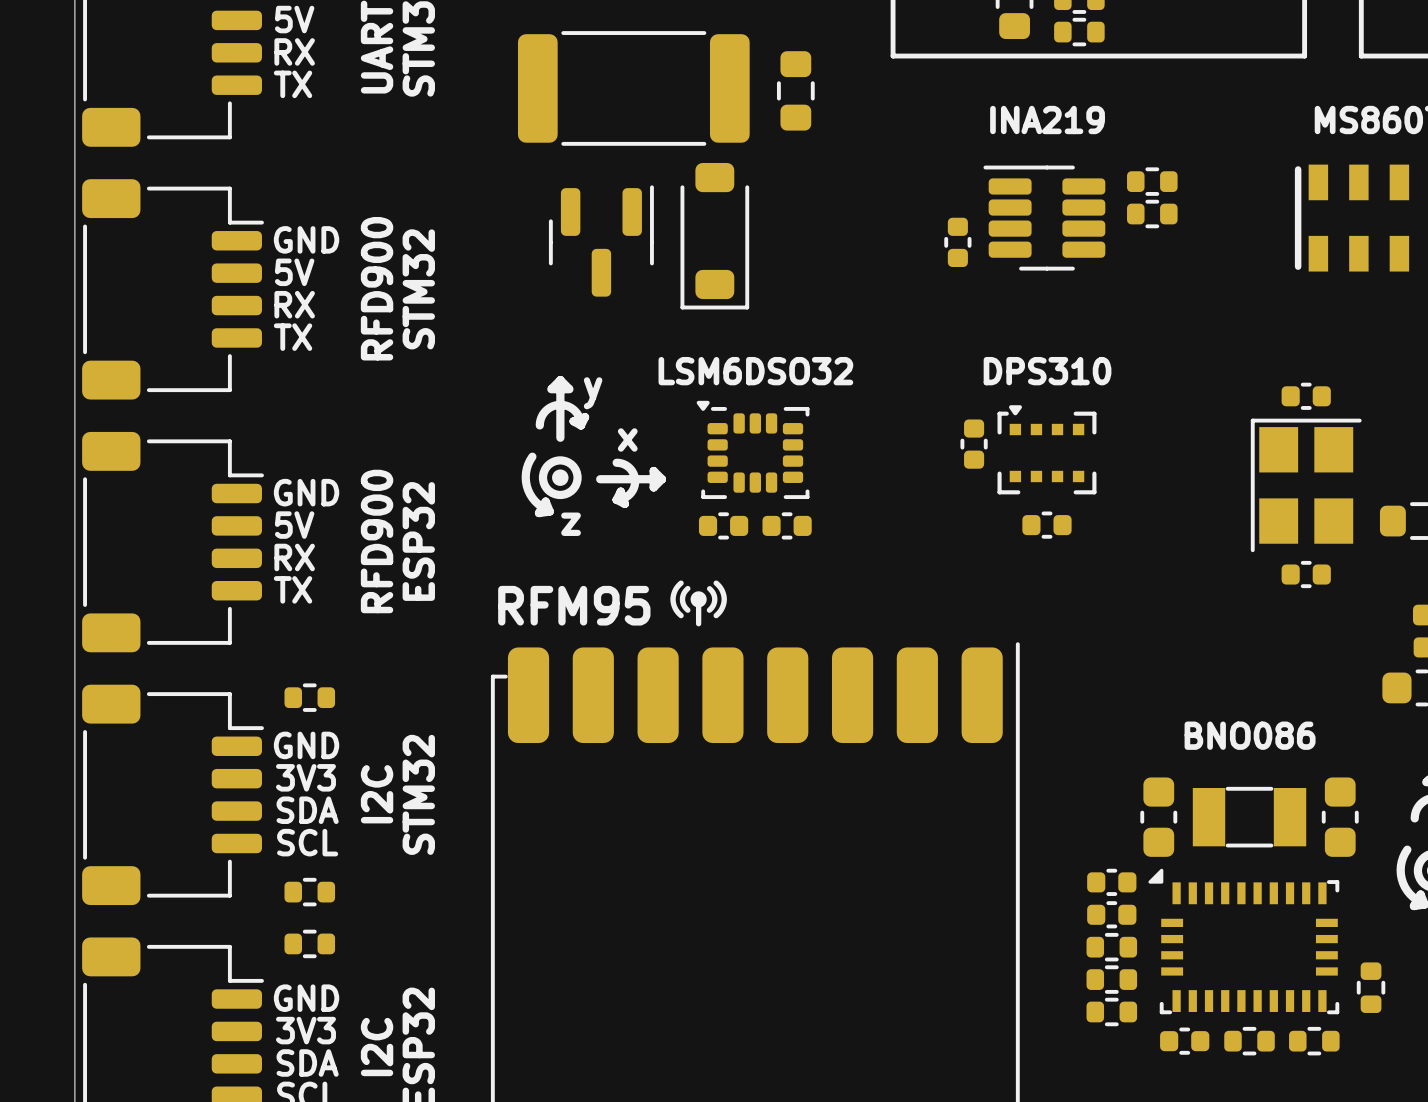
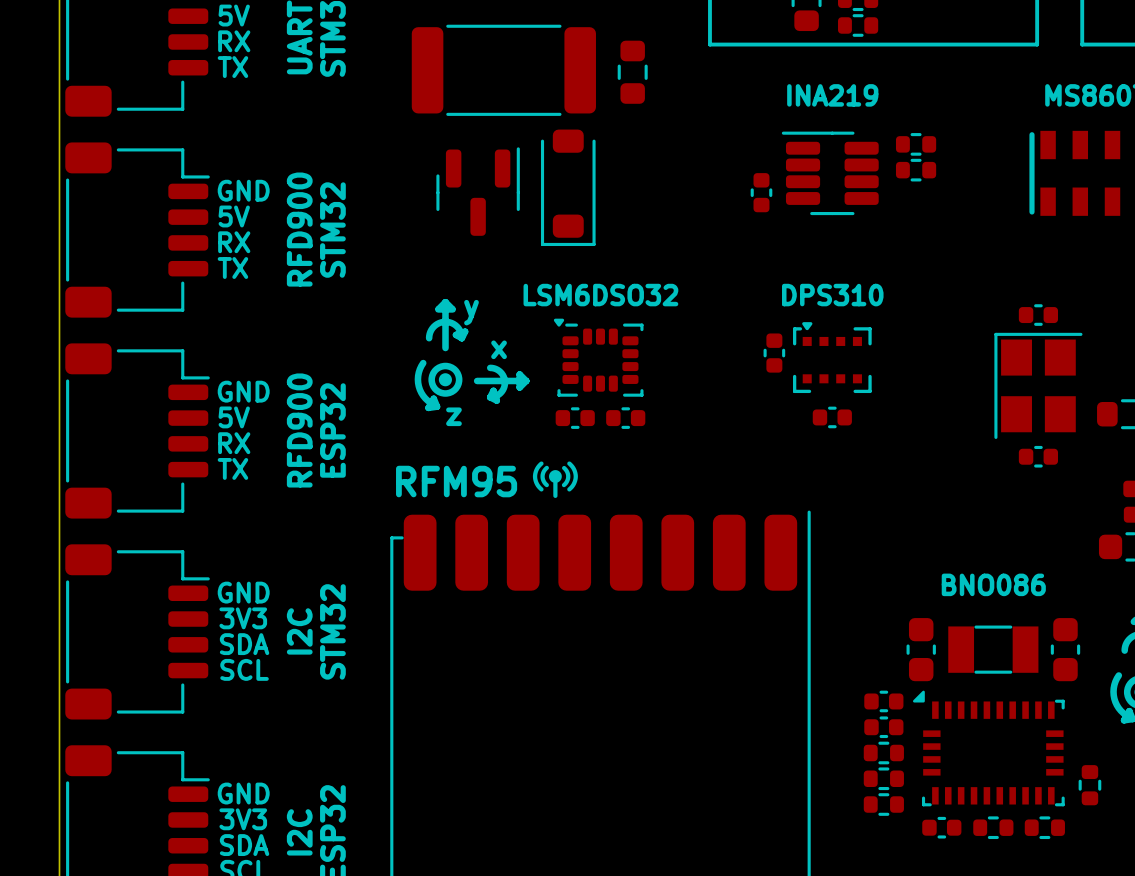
part footprint: [680, 162, 750, 310] -> [540, 129, 596, 247]
part: (309, 697) -> none
part: (309, 892) -> none
part: (309, 943) -> none

